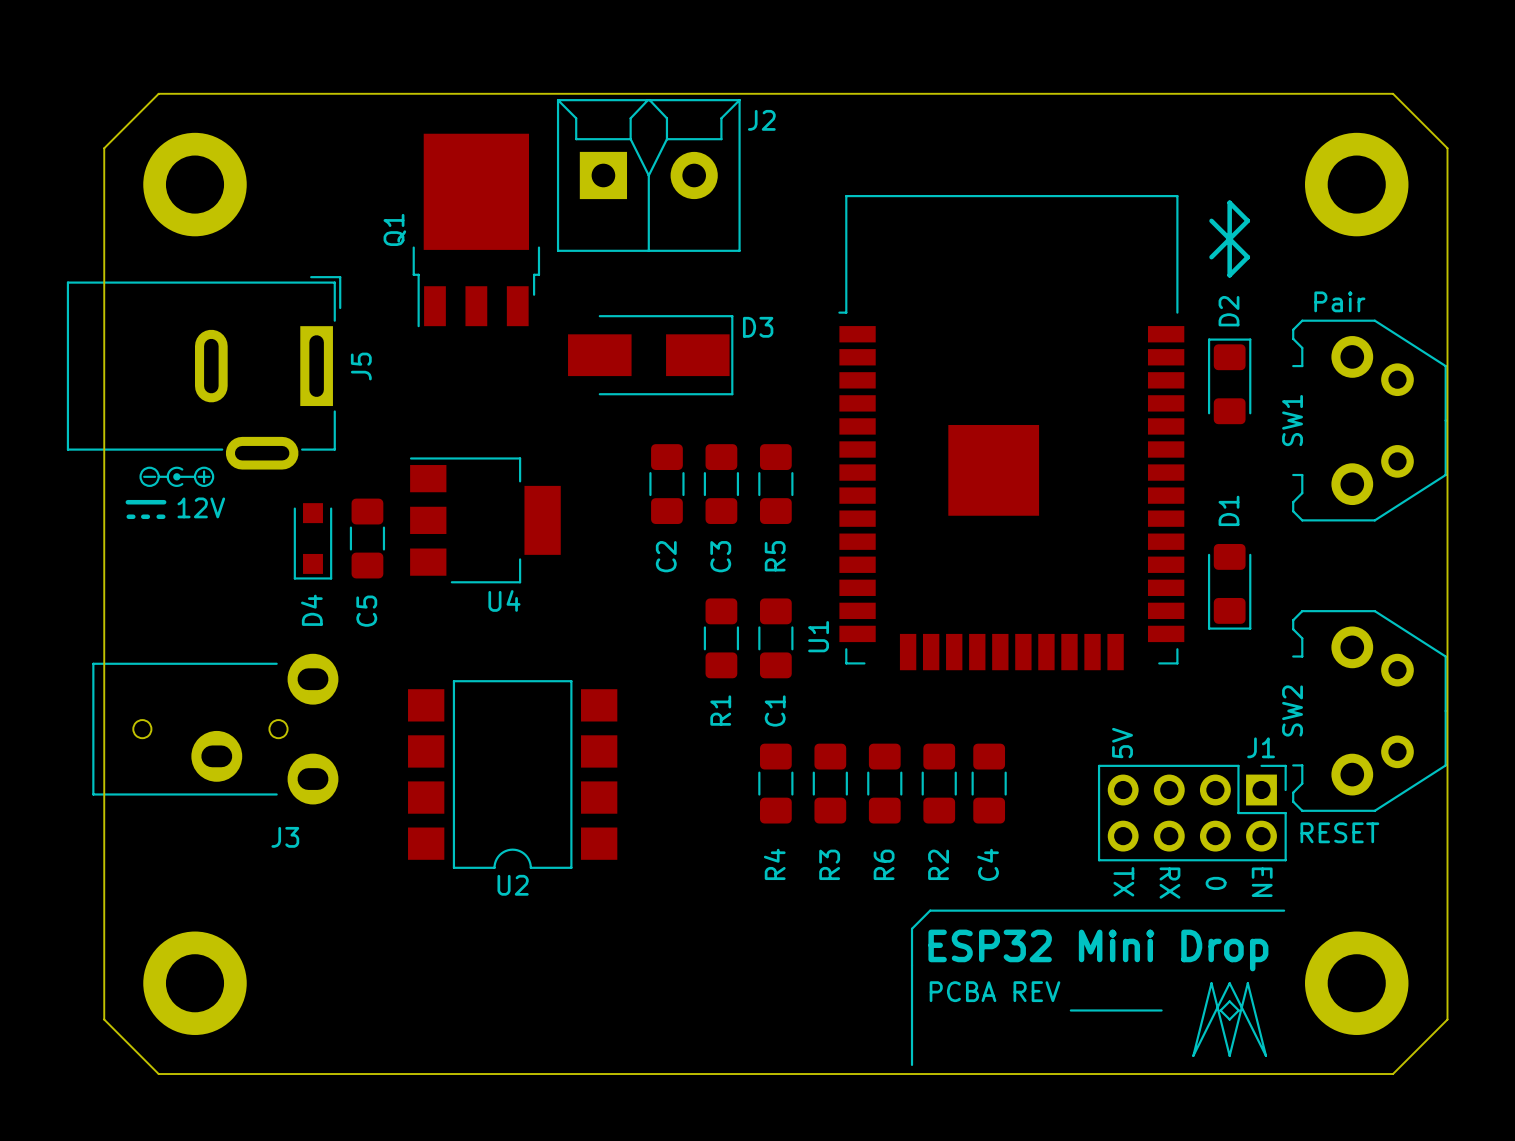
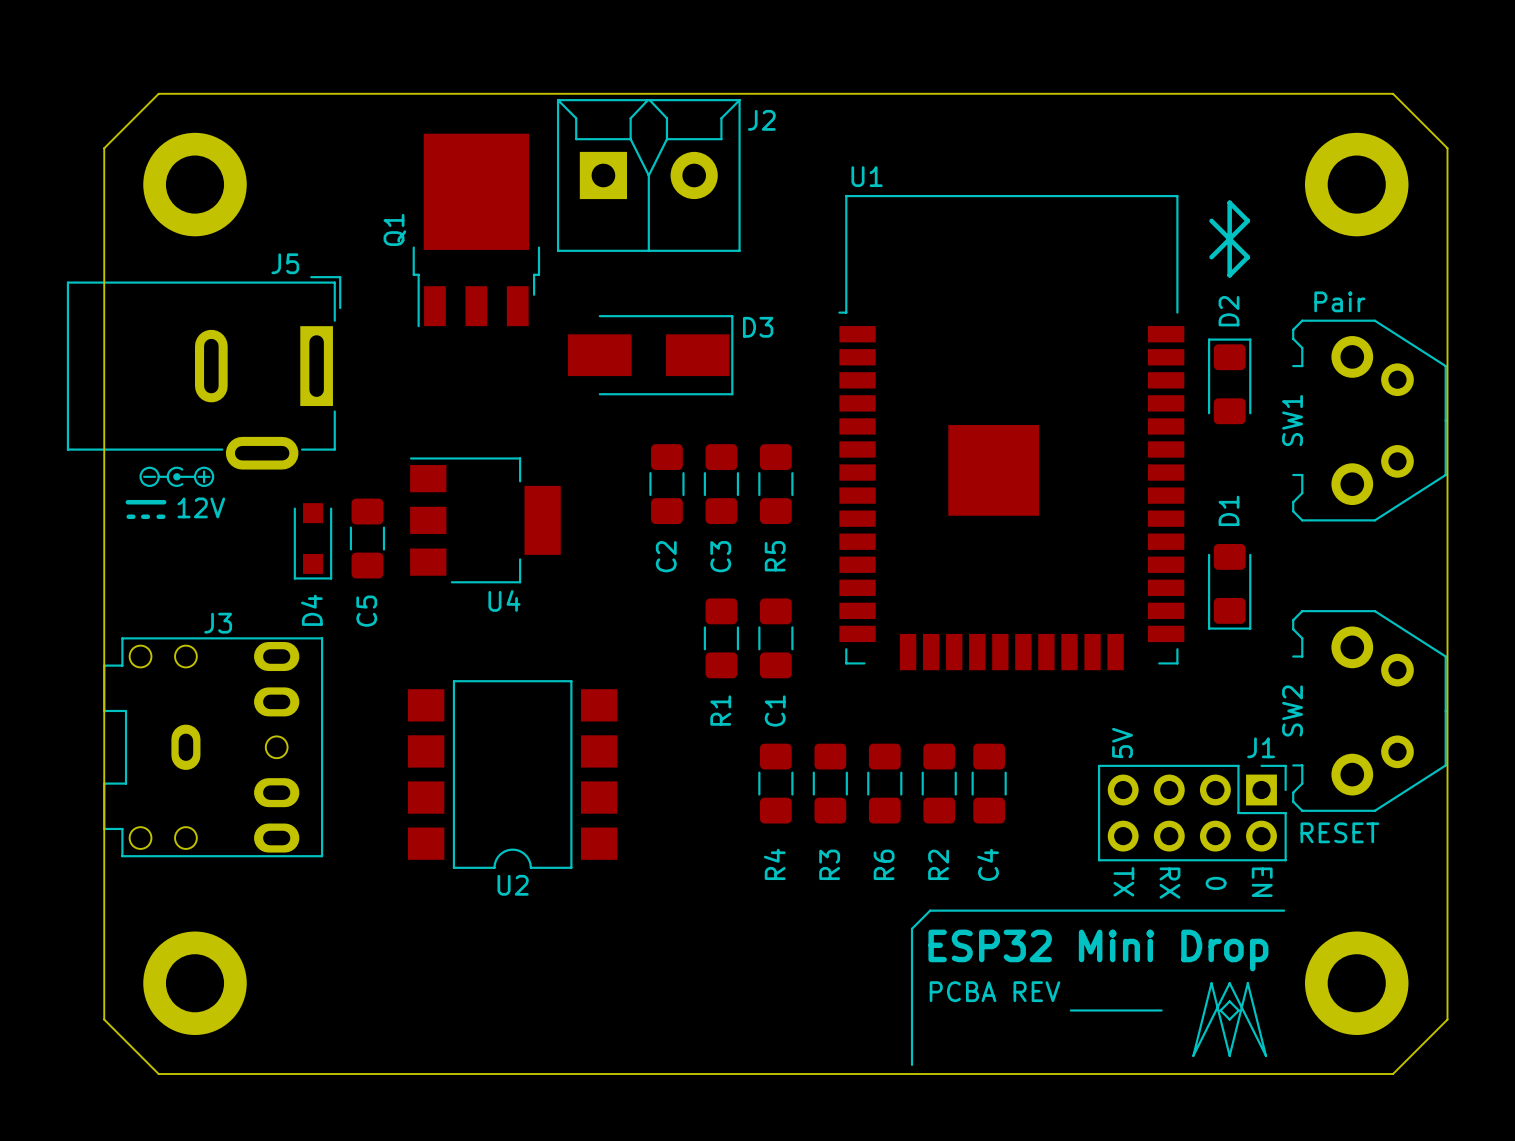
J5 name rotation: 0° (361, 366) -> 90° clockwise (285, 263)
J5 name position: J5 (361, 366) -> J5 (285, 263)
U1 name rotation: 0° (818, 636) -> 90° clockwise (867, 176)
U1 name position: U1 (818, 636) -> U1 (867, 176)
J3 footprint: [92, 653, 339, 805] -> [103, 637, 324, 858]
J3 name position: J3 (285, 837) -> J3 (218, 623)

